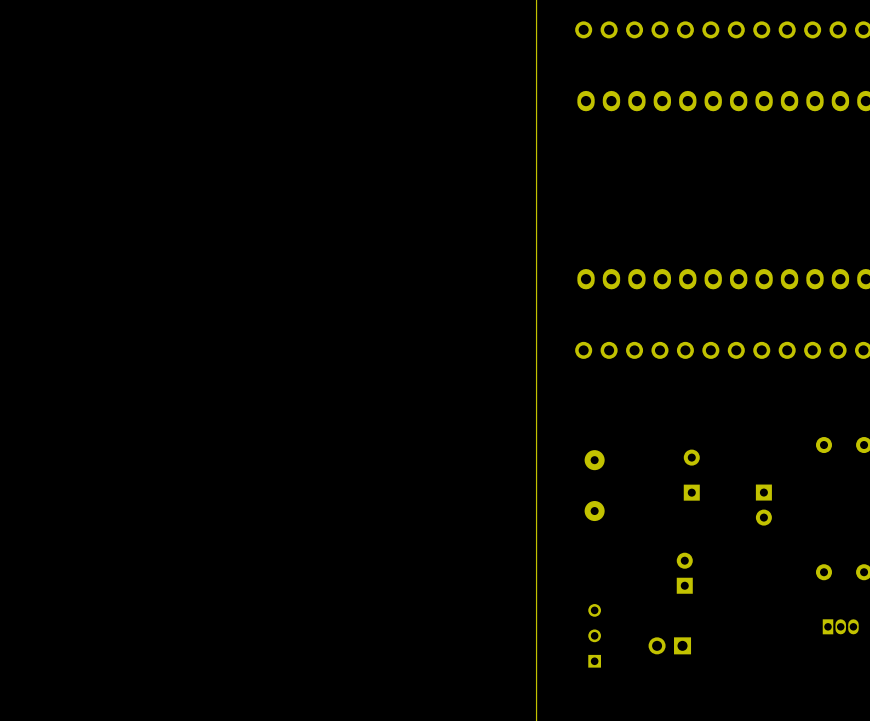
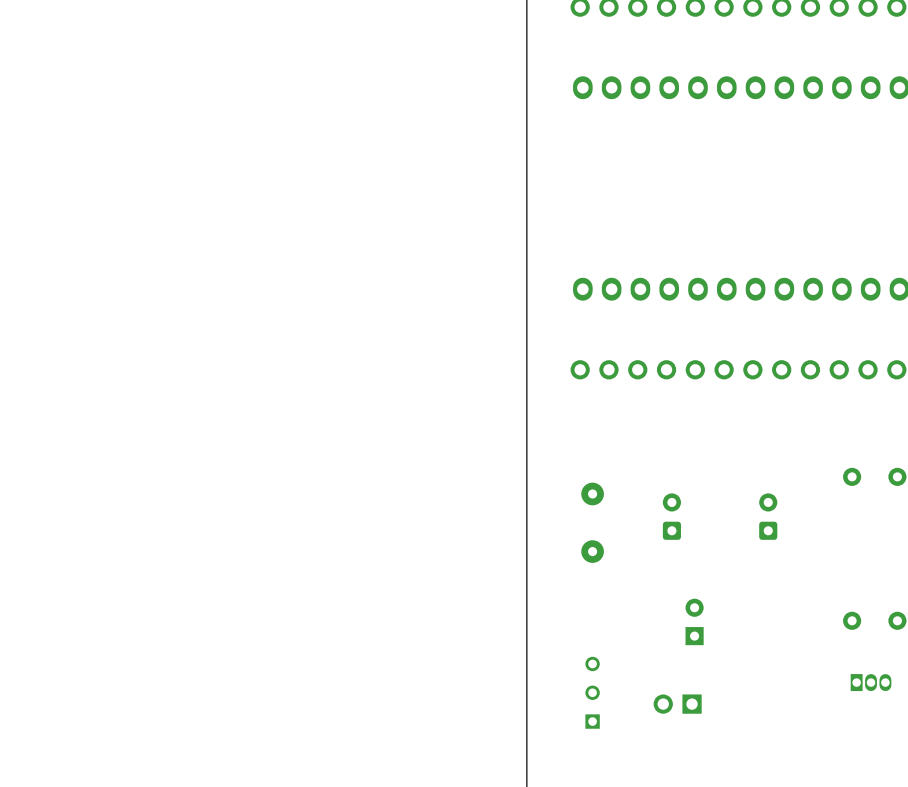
part: (691, 475) -> none
part: none -> (671, 516)
part: none -> (768, 516)
part: (763, 505) -> none

